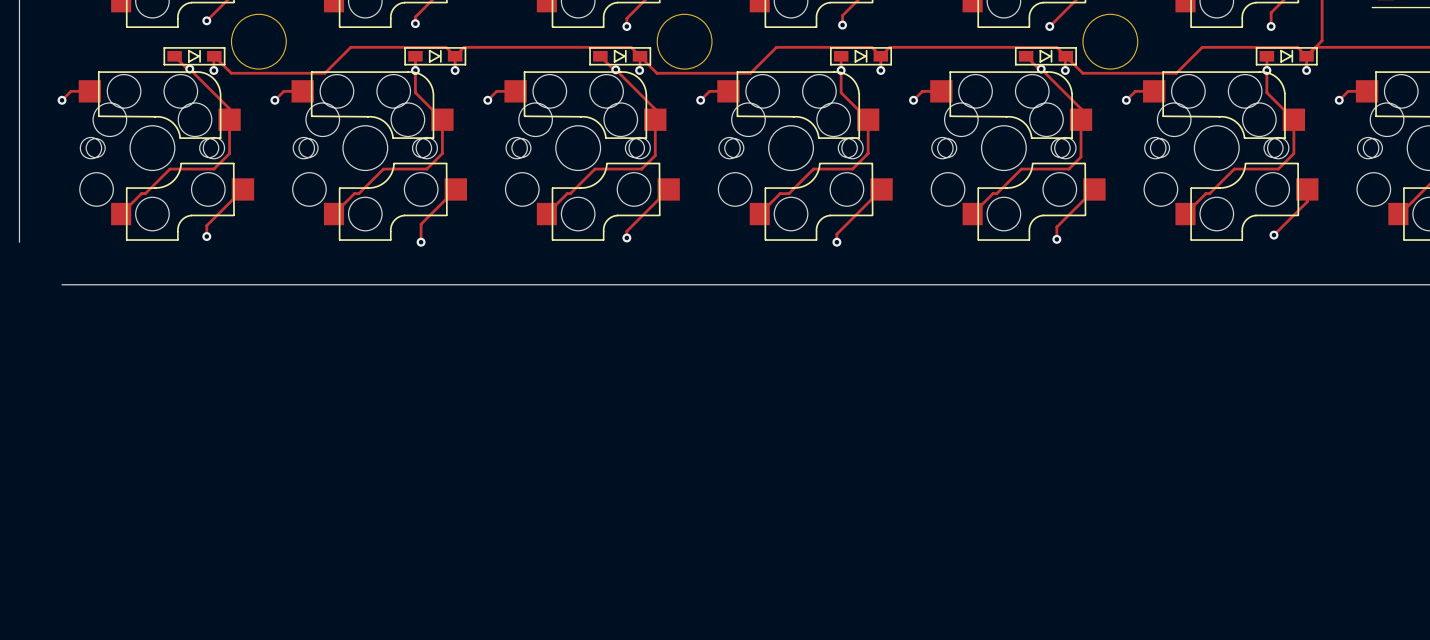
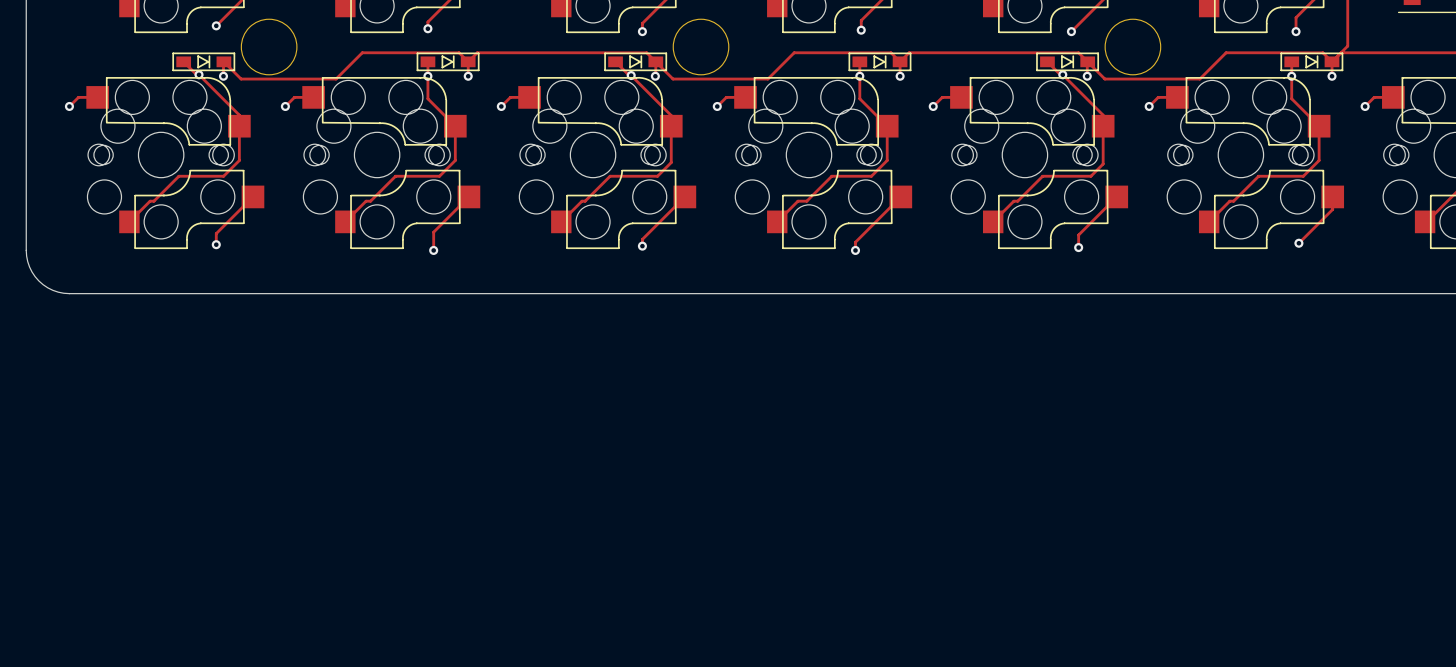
board edge: none -> (26, 250) (29, 266) (38, 280) (52, 290) (69, 293)

